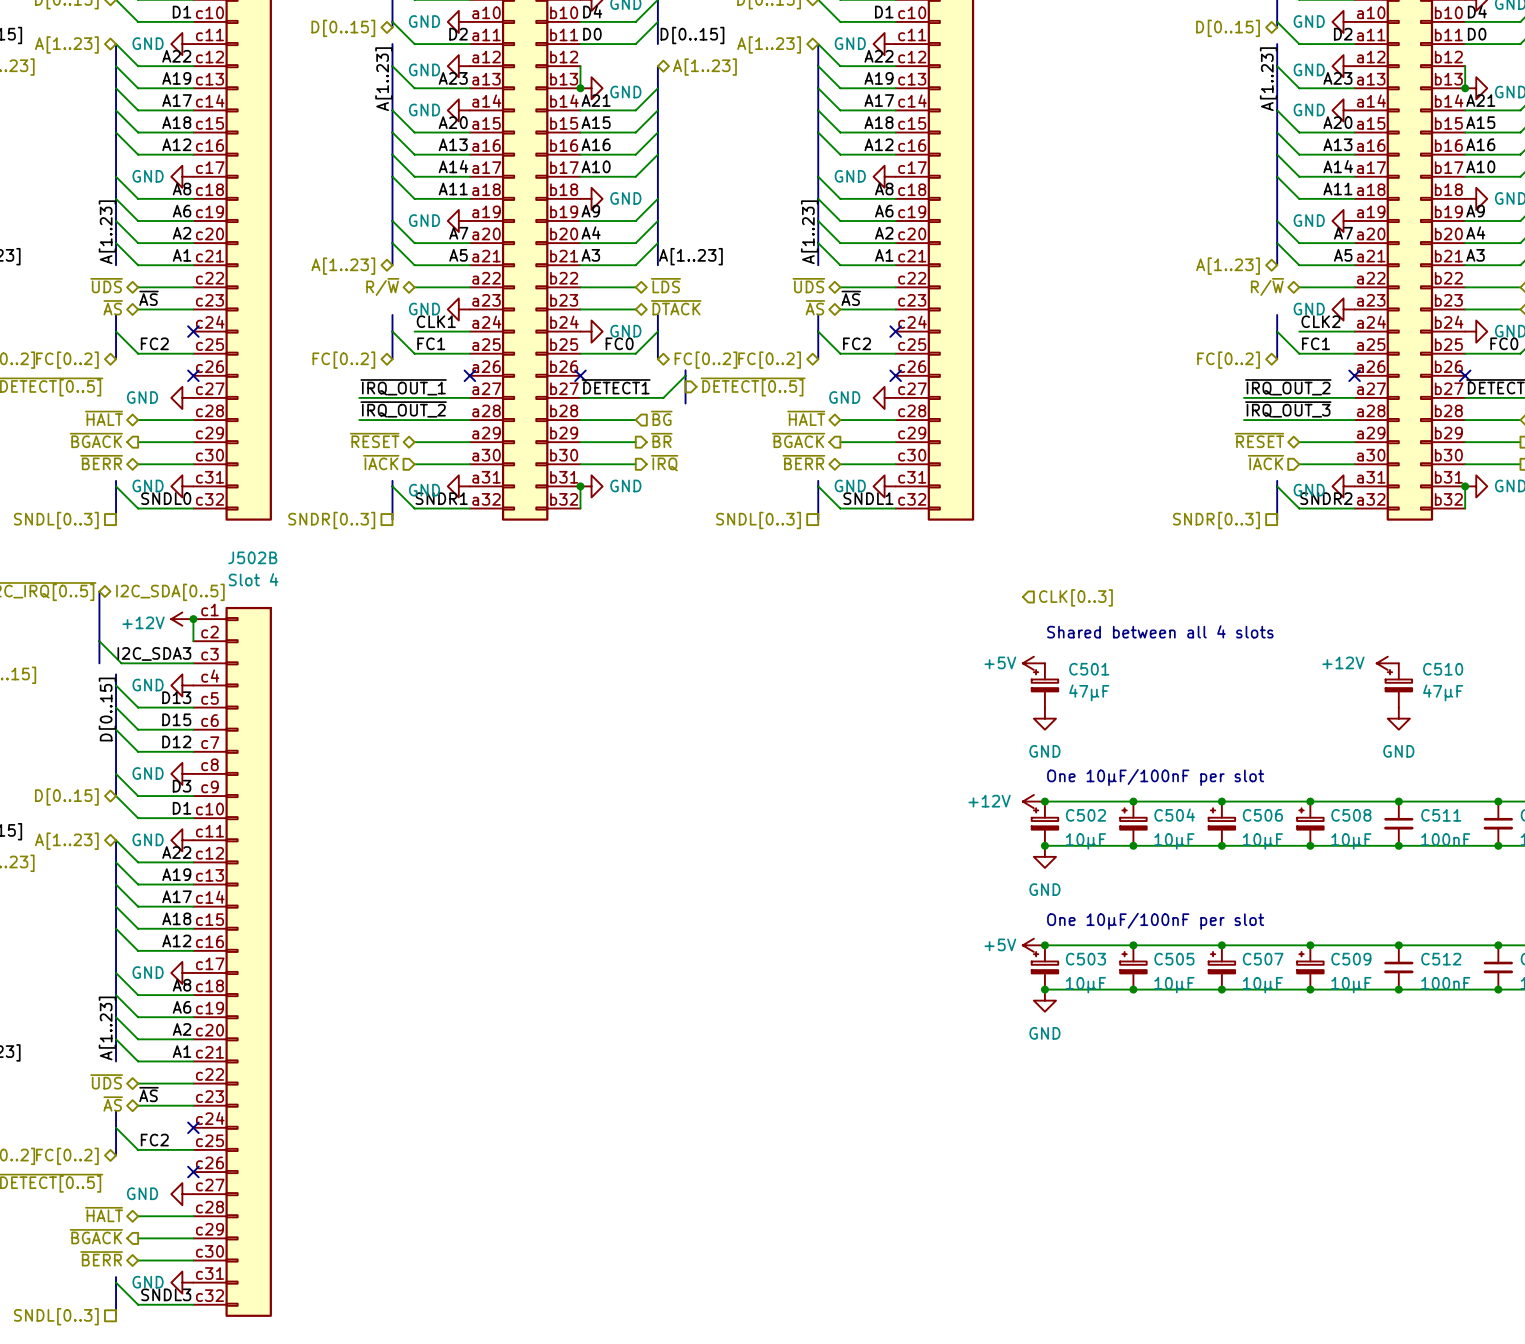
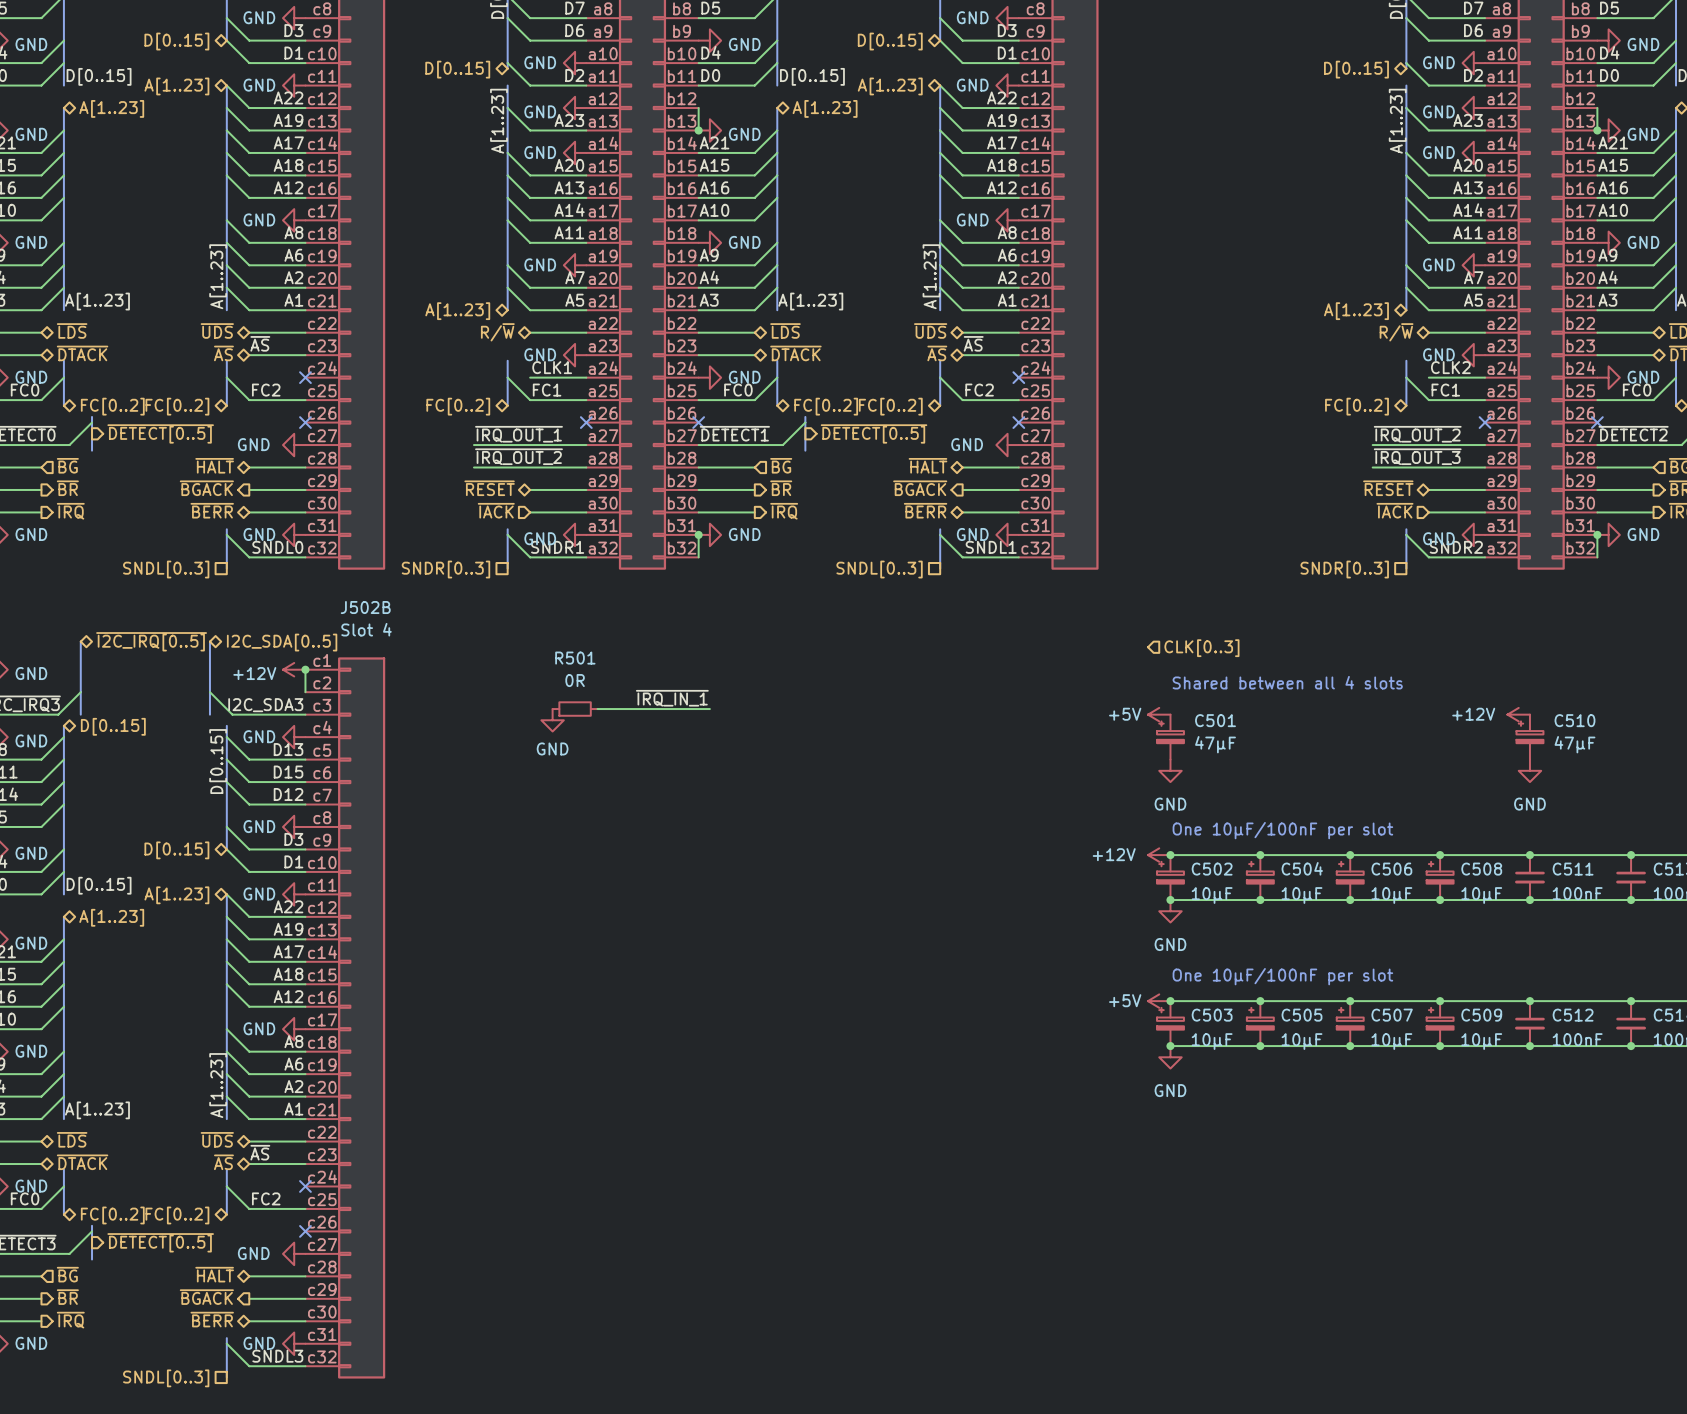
label: none -> ~{IRQ_IN_1} (672, 698)
R501: none -> 0R (575, 709)
wire: none -> (597, 709) (709, 709)
power symbol: none -> GND (552, 720)

